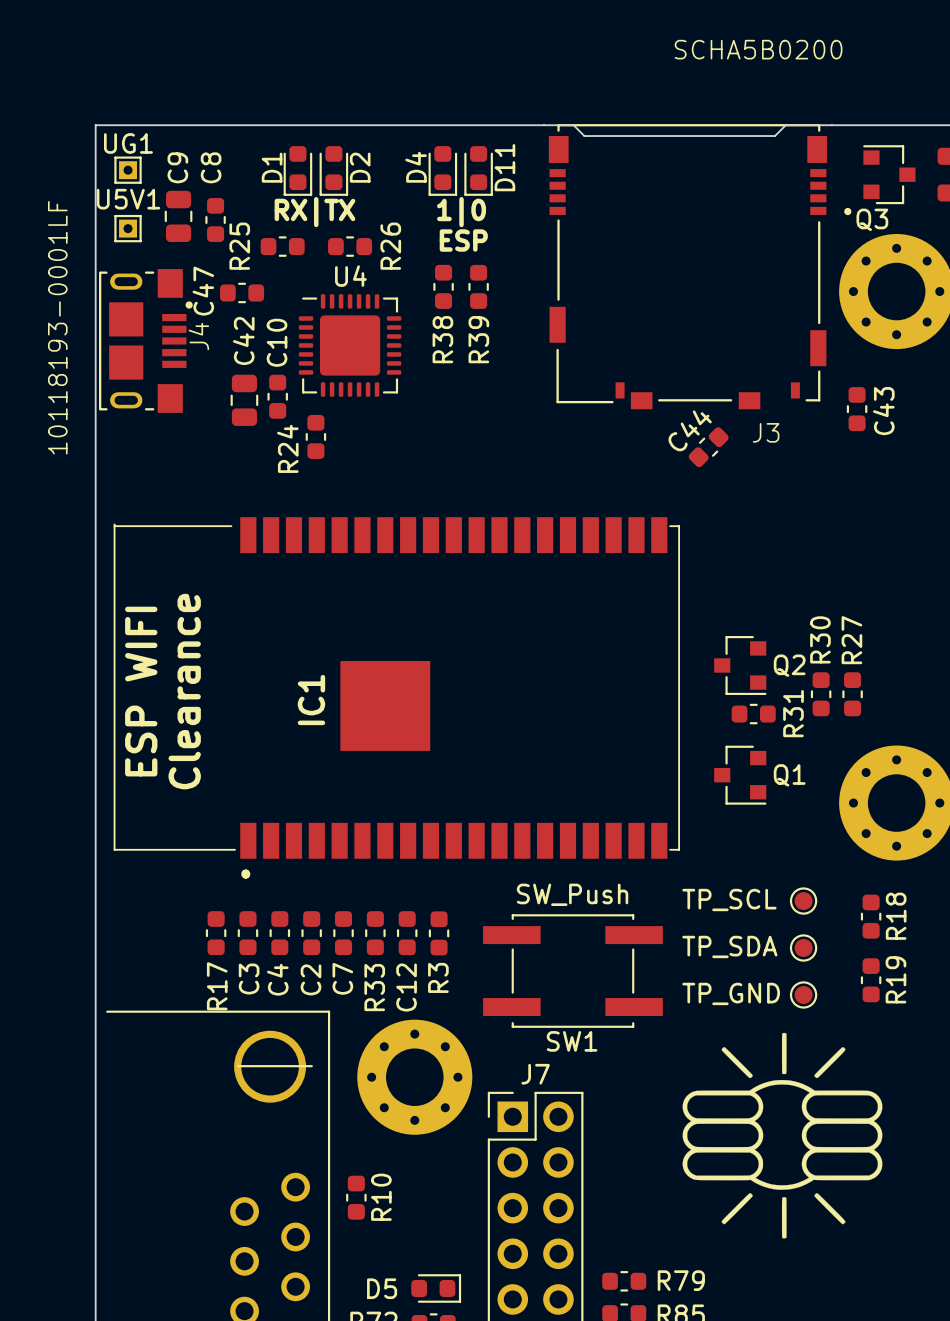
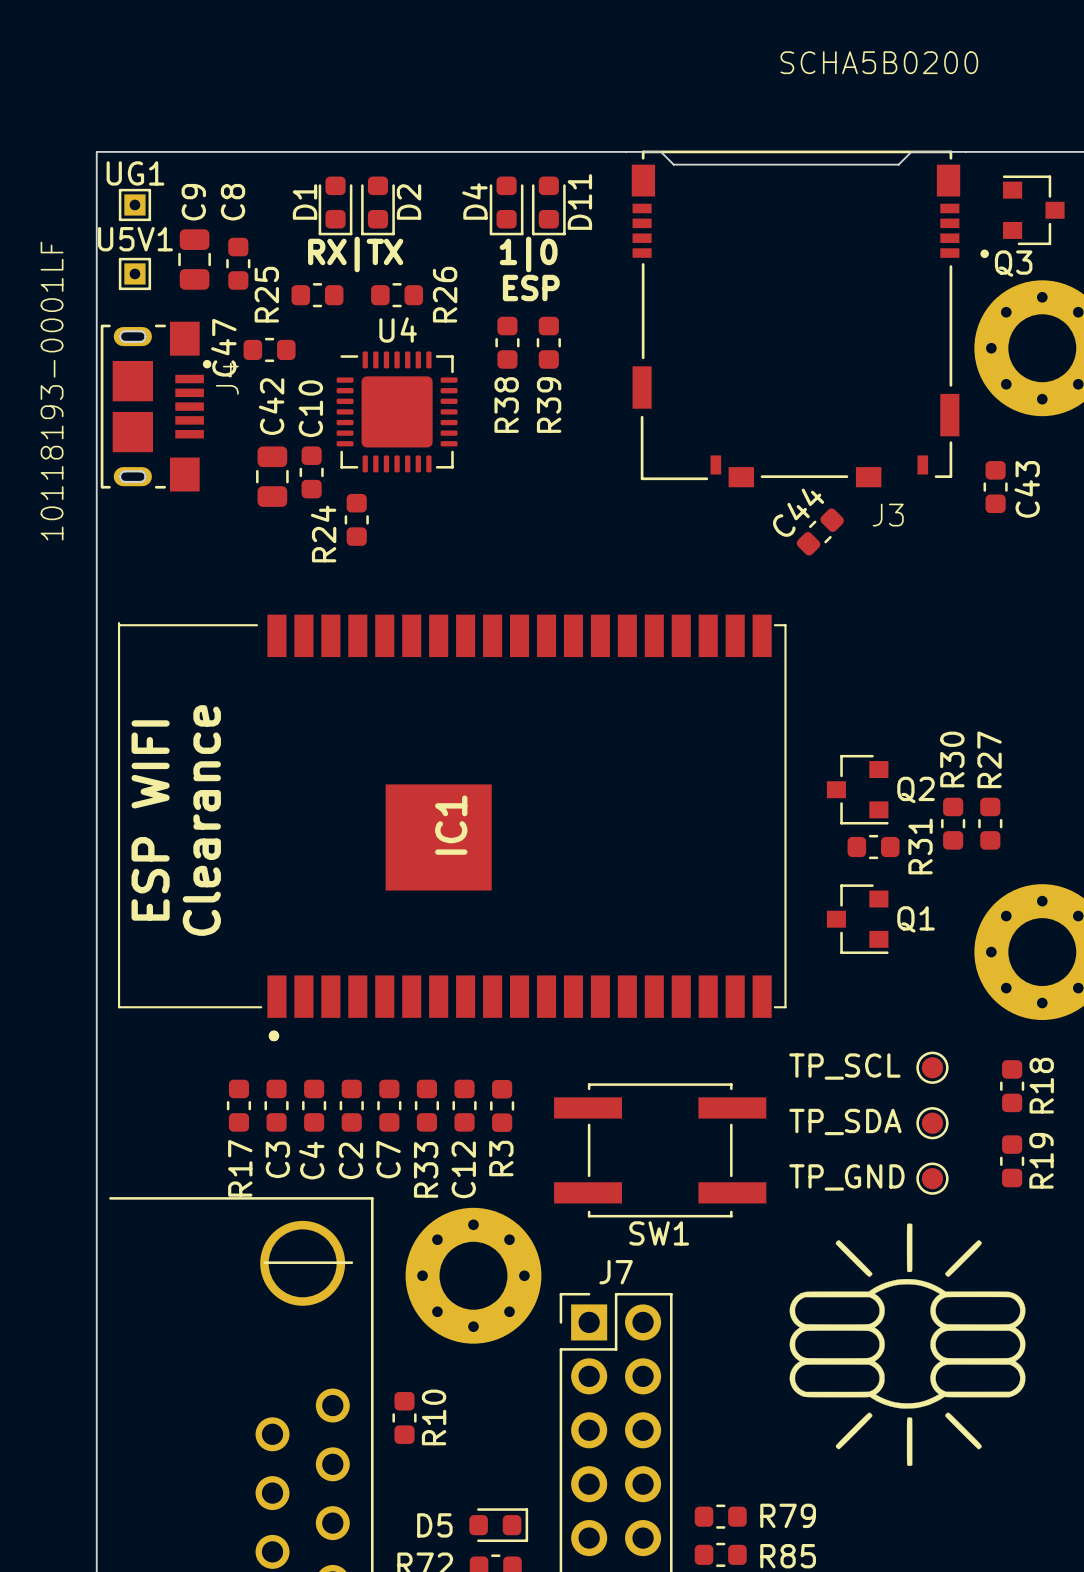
J4 footprint: [99, 269, 193, 413] -> [100, 321, 212, 492]
IC1 name position: IC1 (311, 700) -> IC1 (451, 825)
SW1 value: SW_Push (572, 894) -> none

